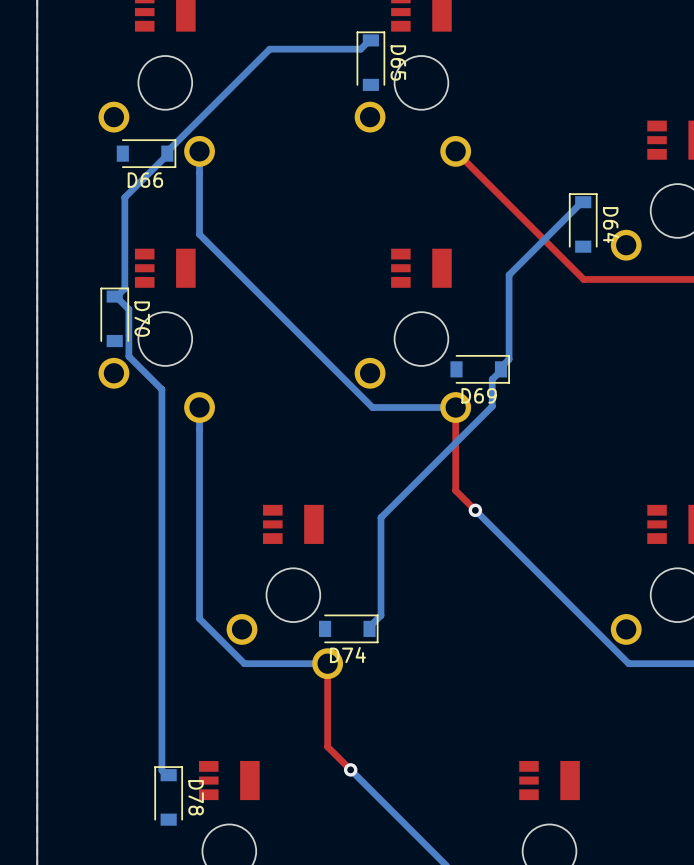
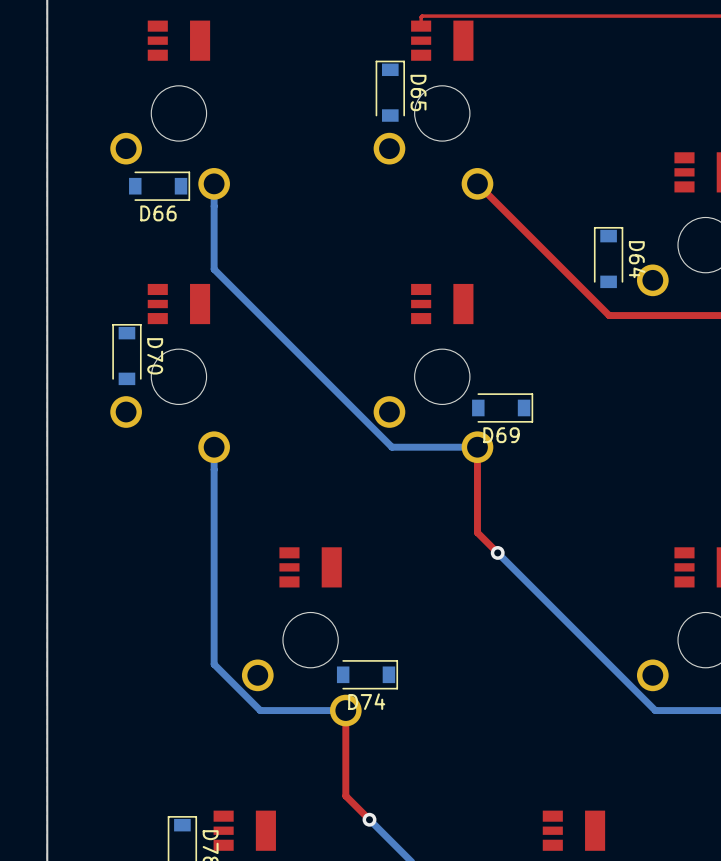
bottom track: (370, 40) (360, 49) (269, 49) (167, 151) (167, 155) (124, 197) (124, 288) (114, 296) -> none
bottom track: (583, 202) (509, 274) (509, 359) (492, 379) (492, 406) (381, 517) (381, 615) (369, 628) -> none
bottom track: (116, 296) (128, 309) (128, 356) (161, 389) (161, 770) (168, 775) -> none

